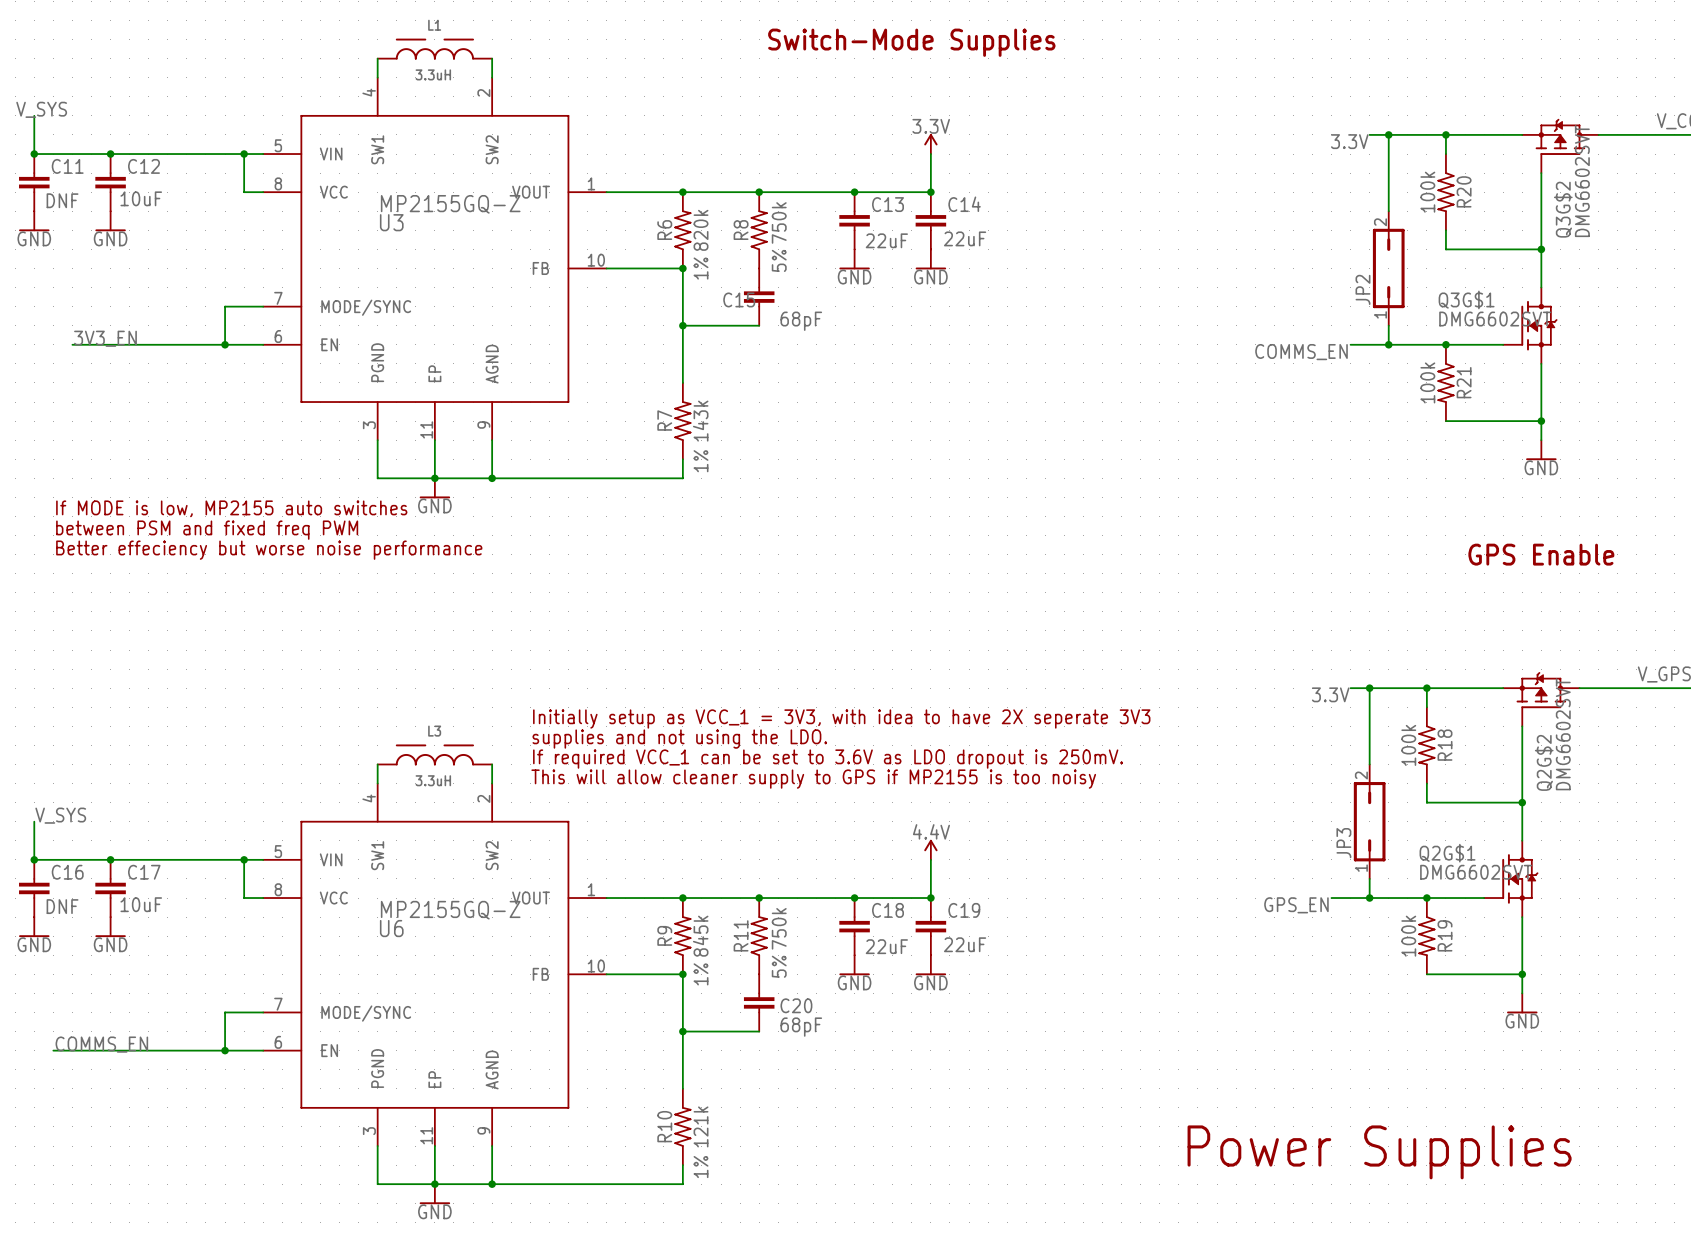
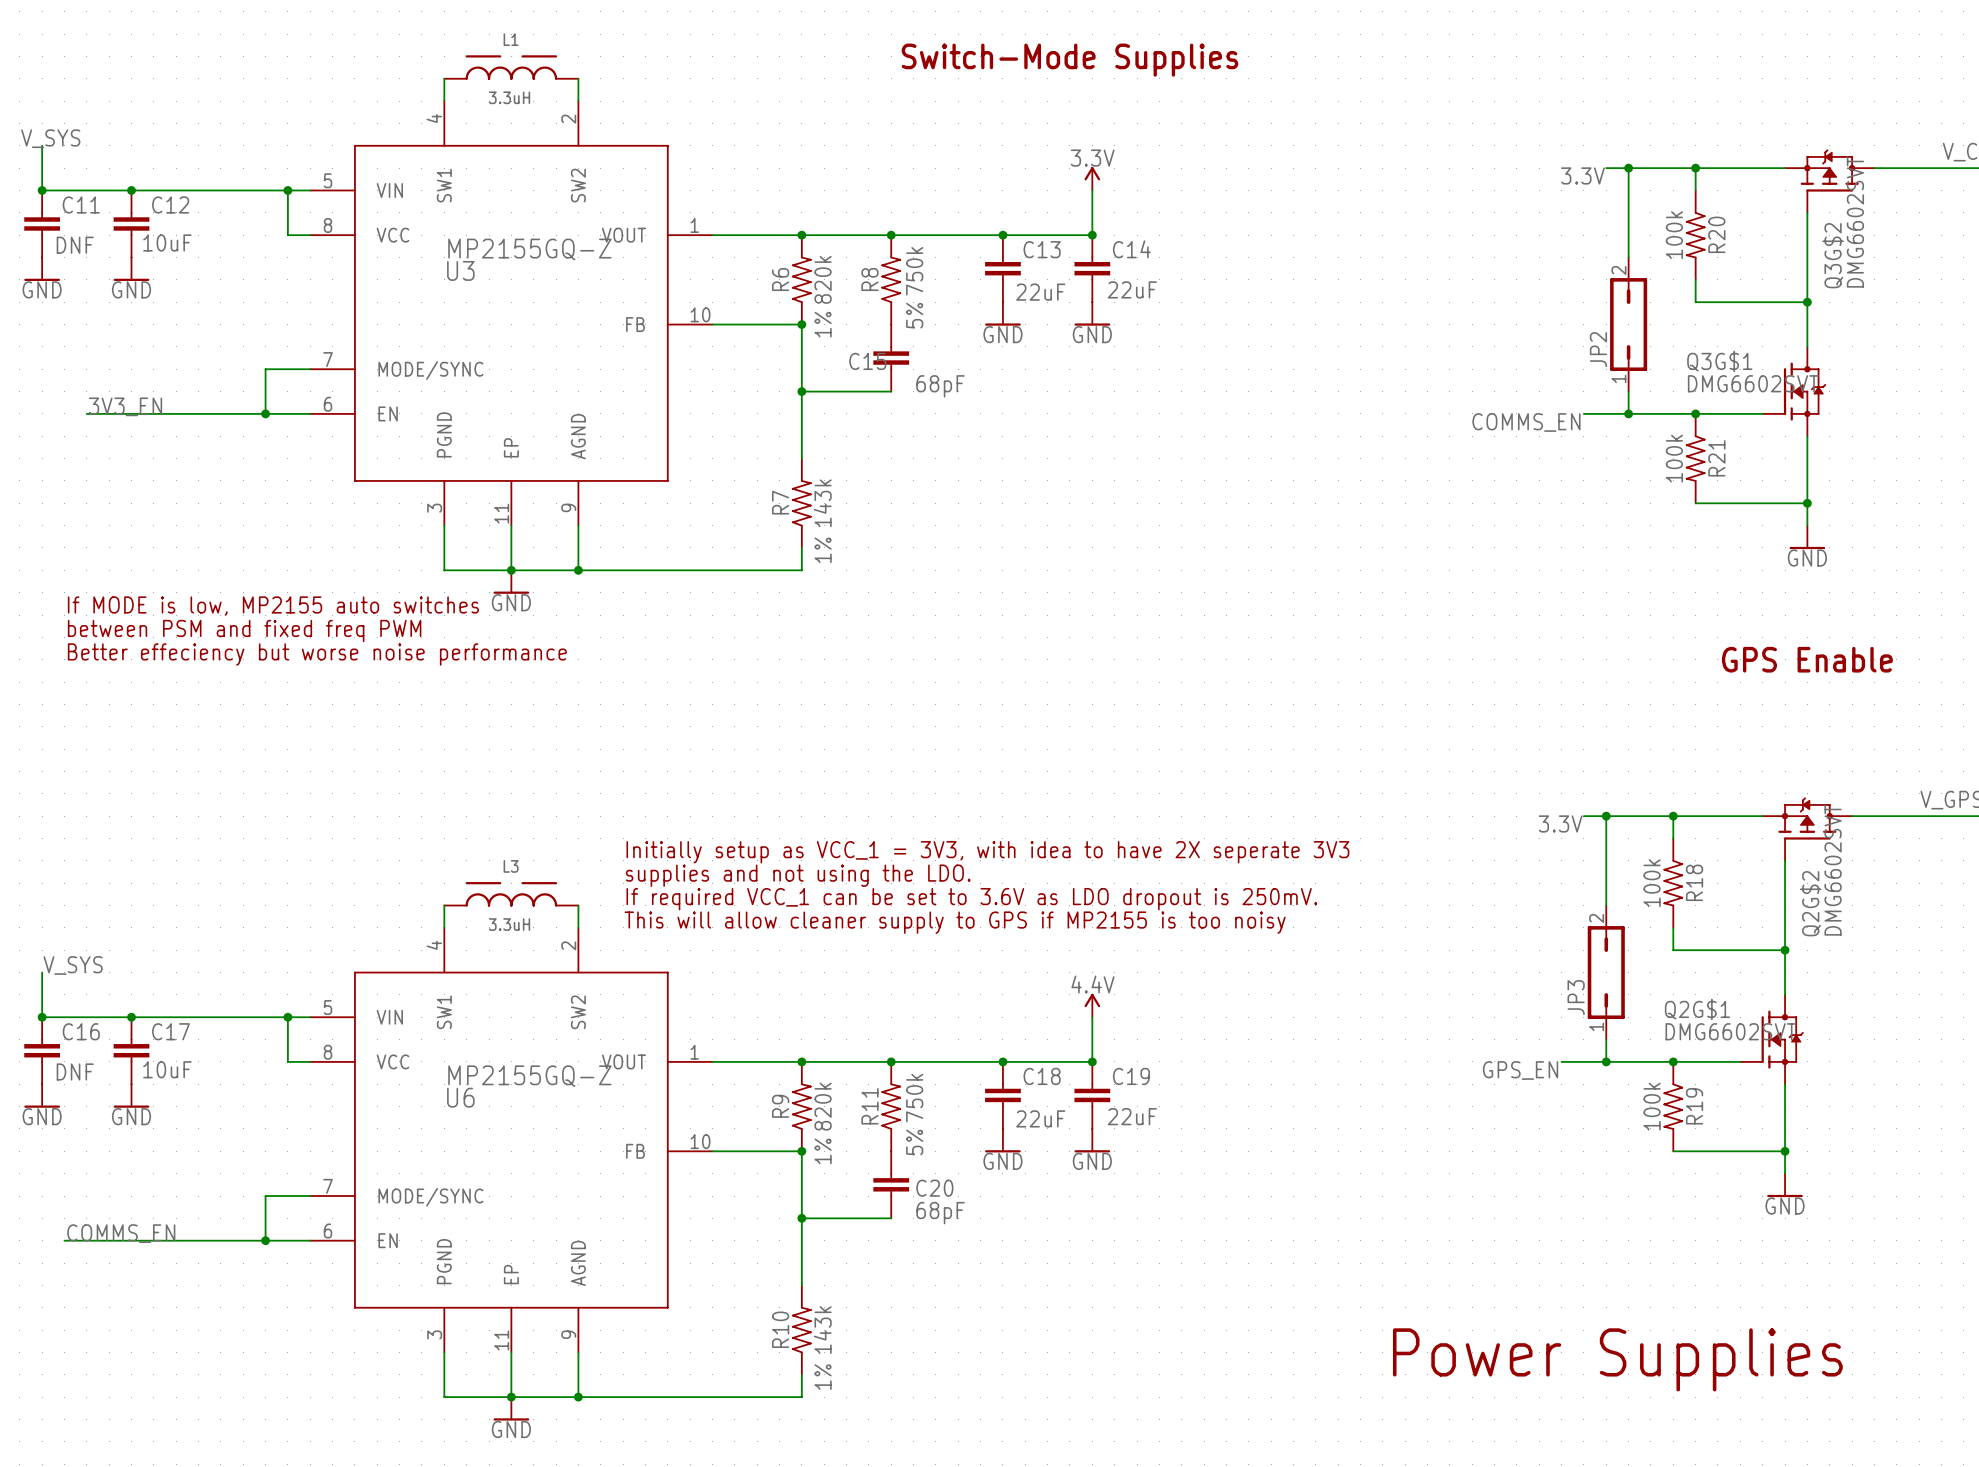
R9 value: 845k (700, 936) -> 820k (823, 1106)
R10 value: 121k (701, 1126) -> 143k (822, 1330)

